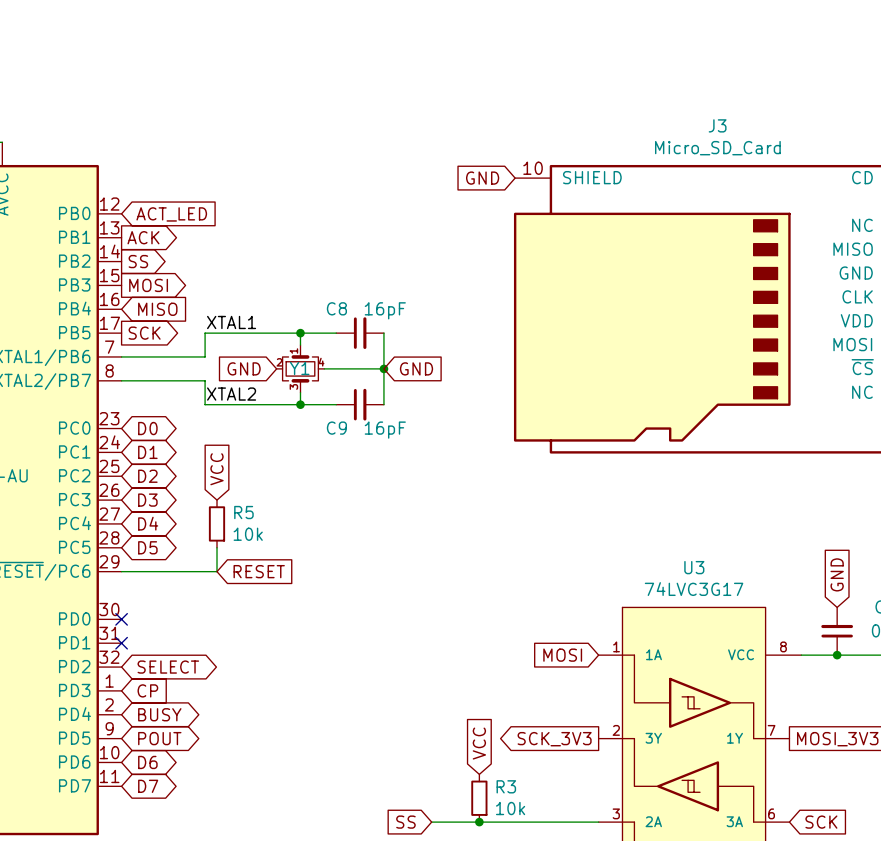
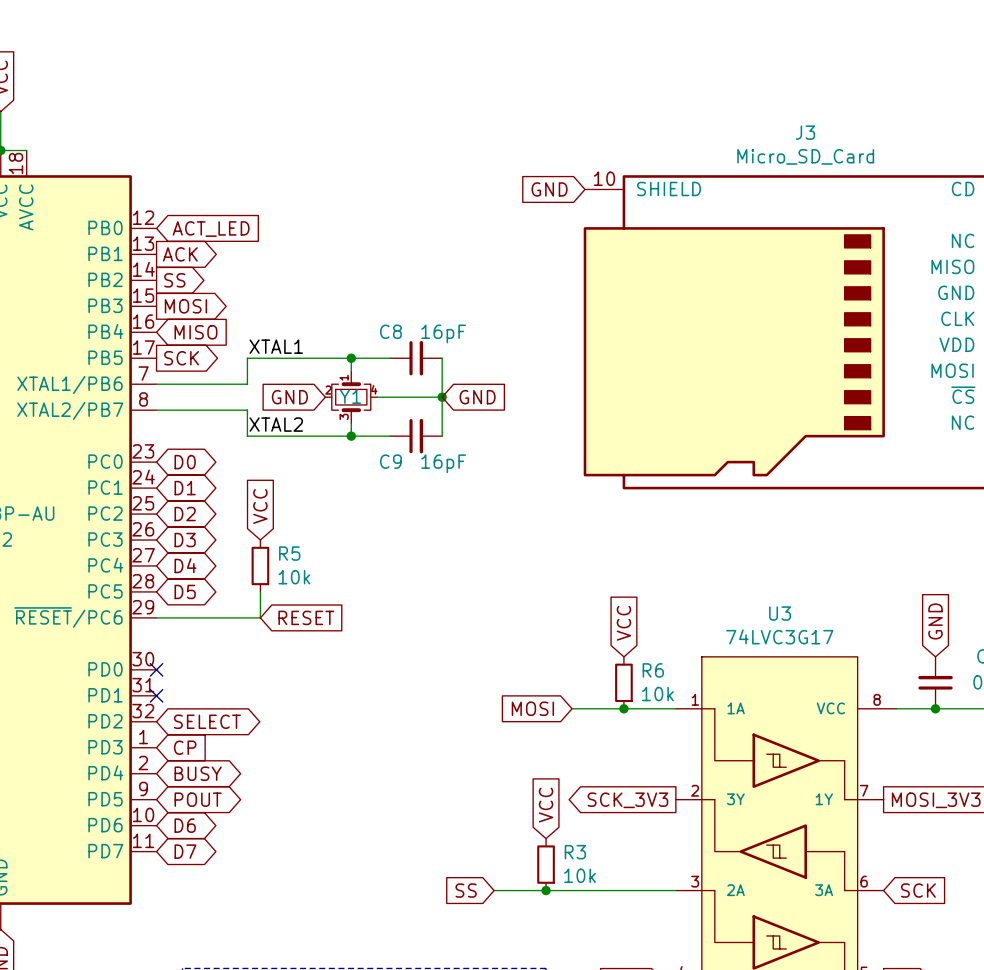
global label: none -> VCC (623, 623)
R6: none -> 10k (623, 682)
wire: none -> (572, 708) (675, 708)
junction: none -> (623, 708)
global label position: MOSI (562, 655) -> MOSI (532, 708)

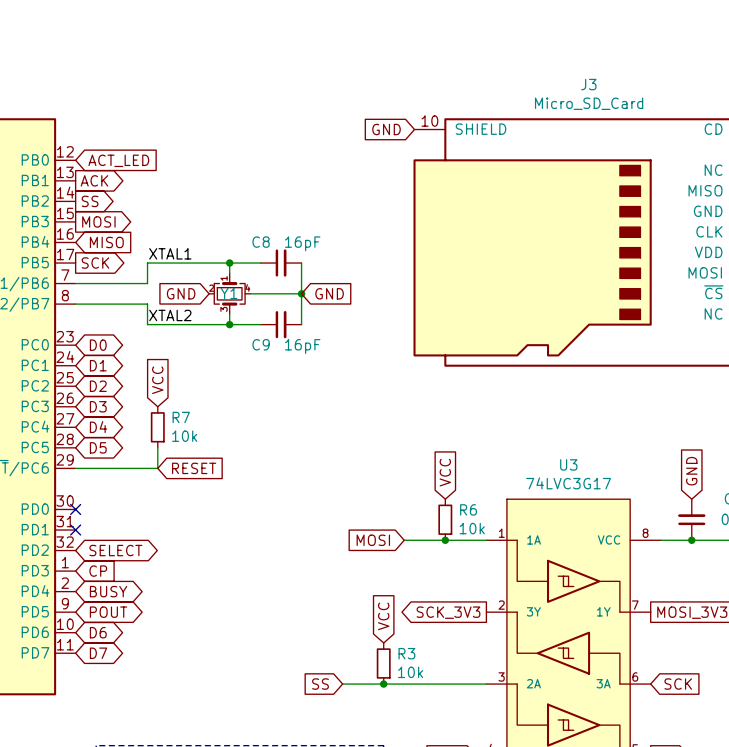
R5 name: R5 (289, 553) -> R7 (181, 417)

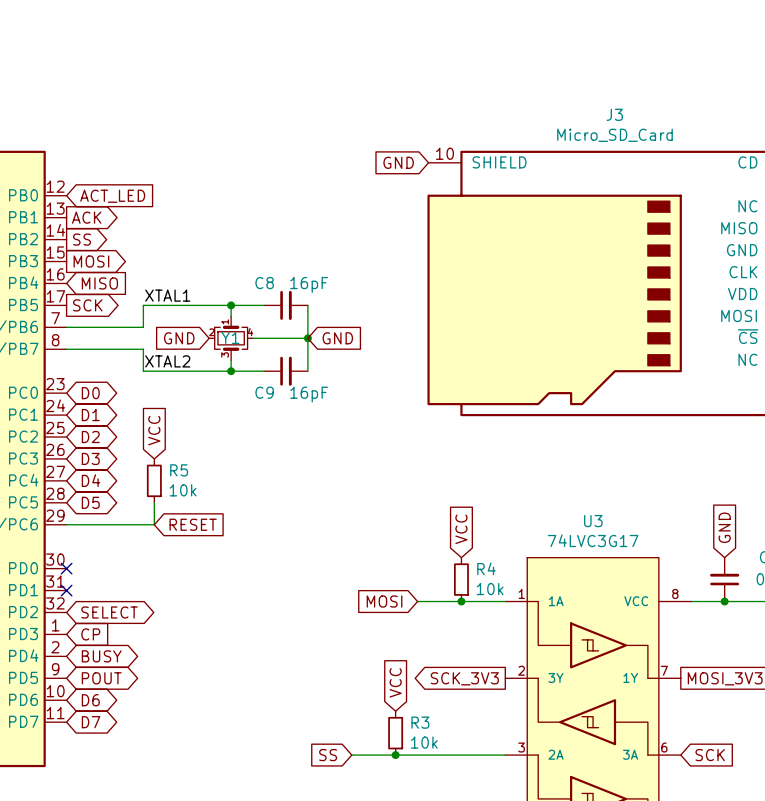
R7 name: R7 (181, 417) -> R5 (179, 470)
R6 name: R6 (468, 509) -> R4 (486, 568)

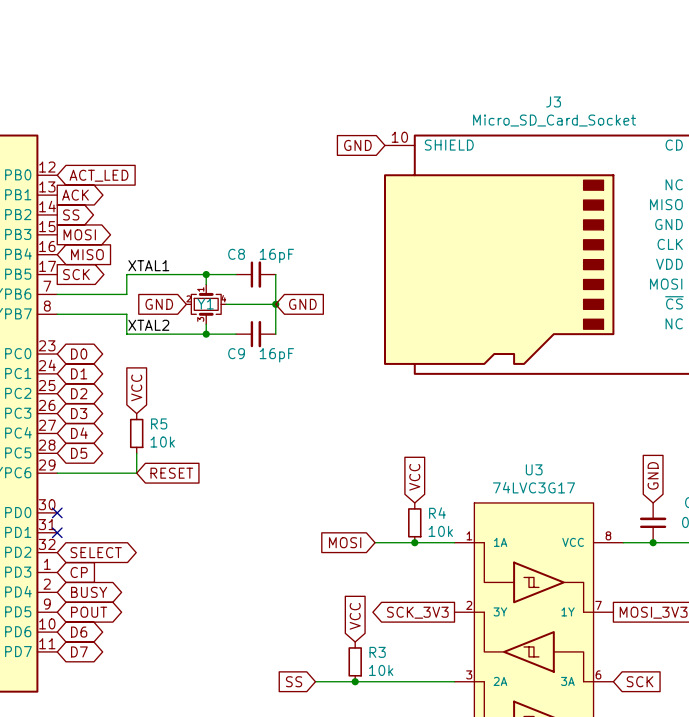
J3 value: Micro_SD_Card (614, 135) -> Micro_SD_Card_Socket (554, 120)

